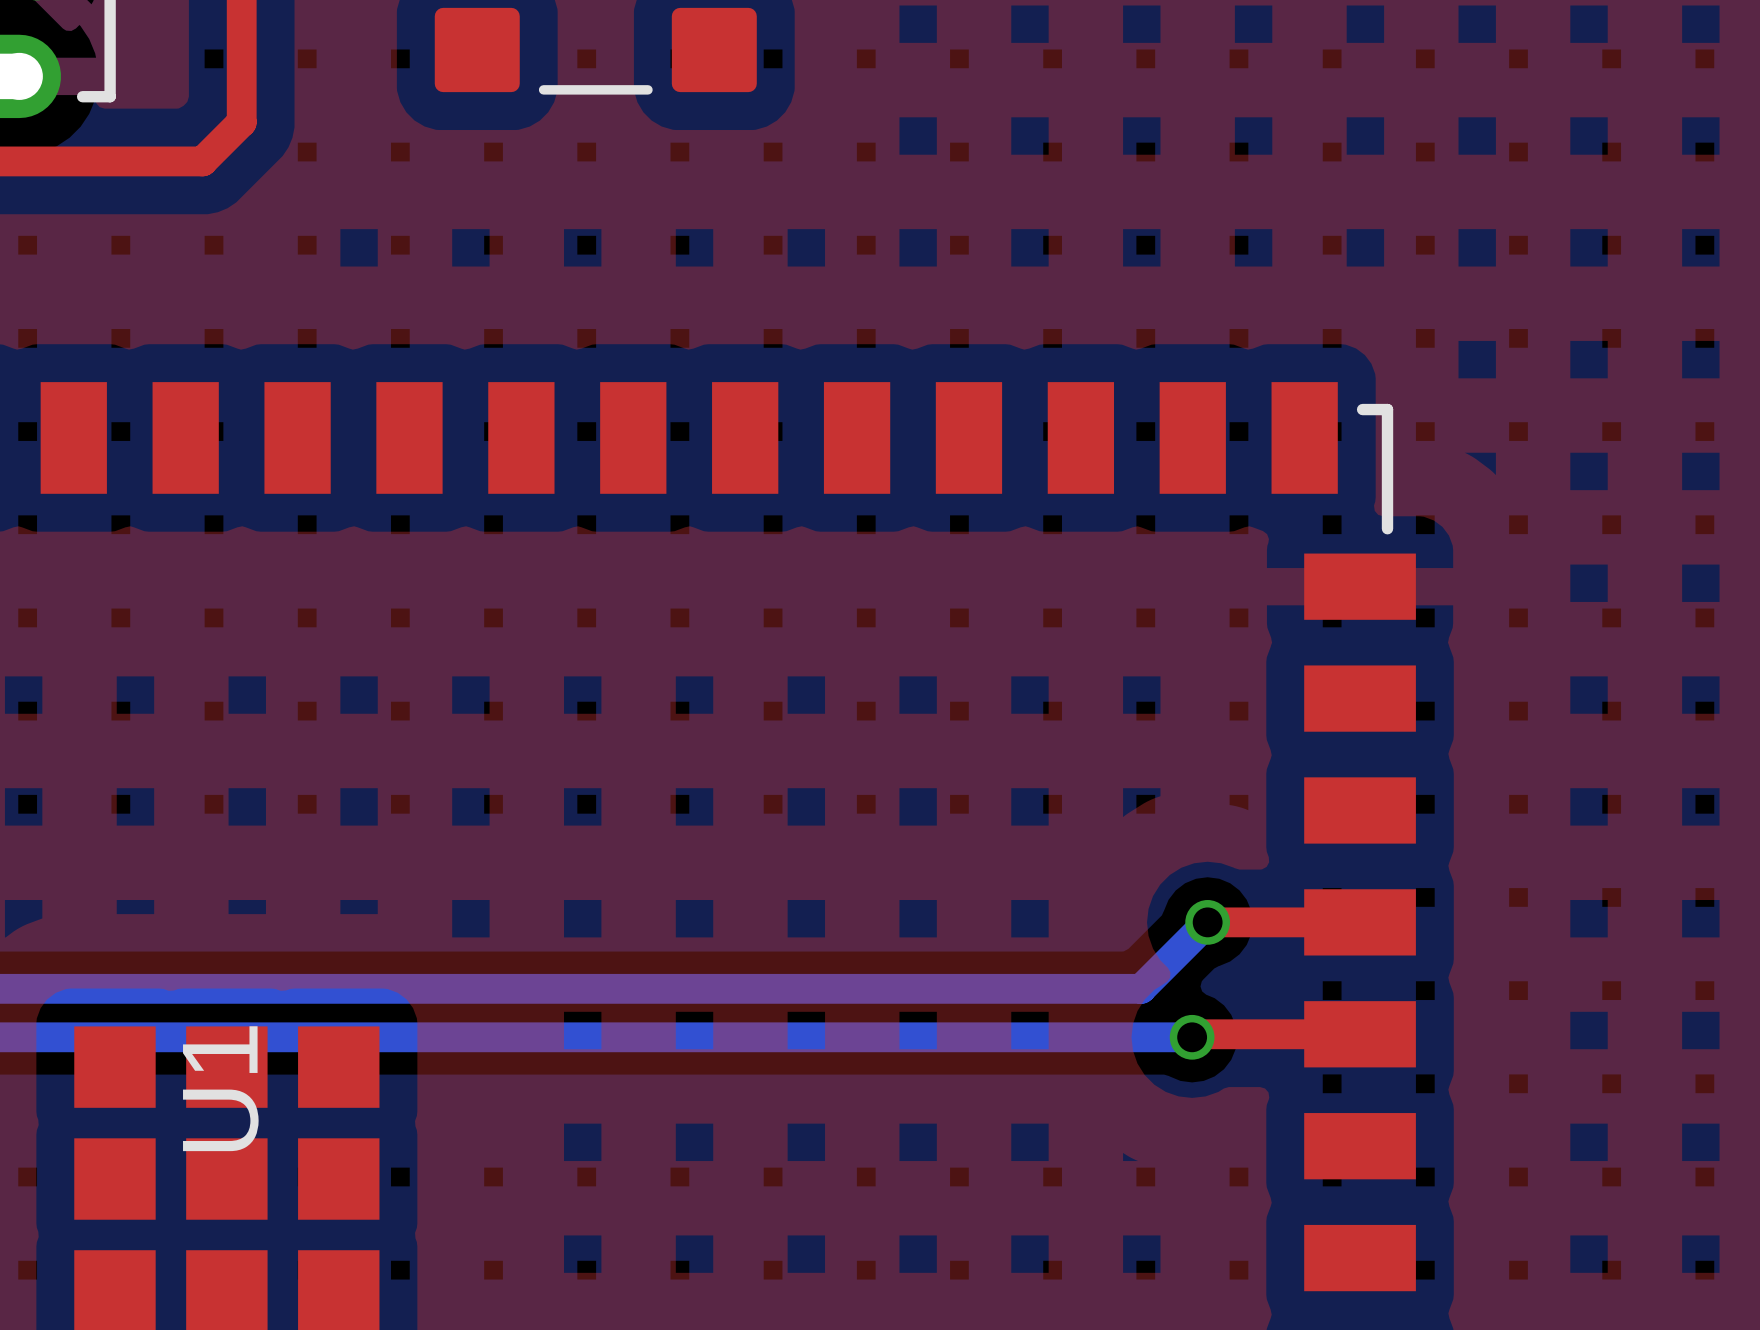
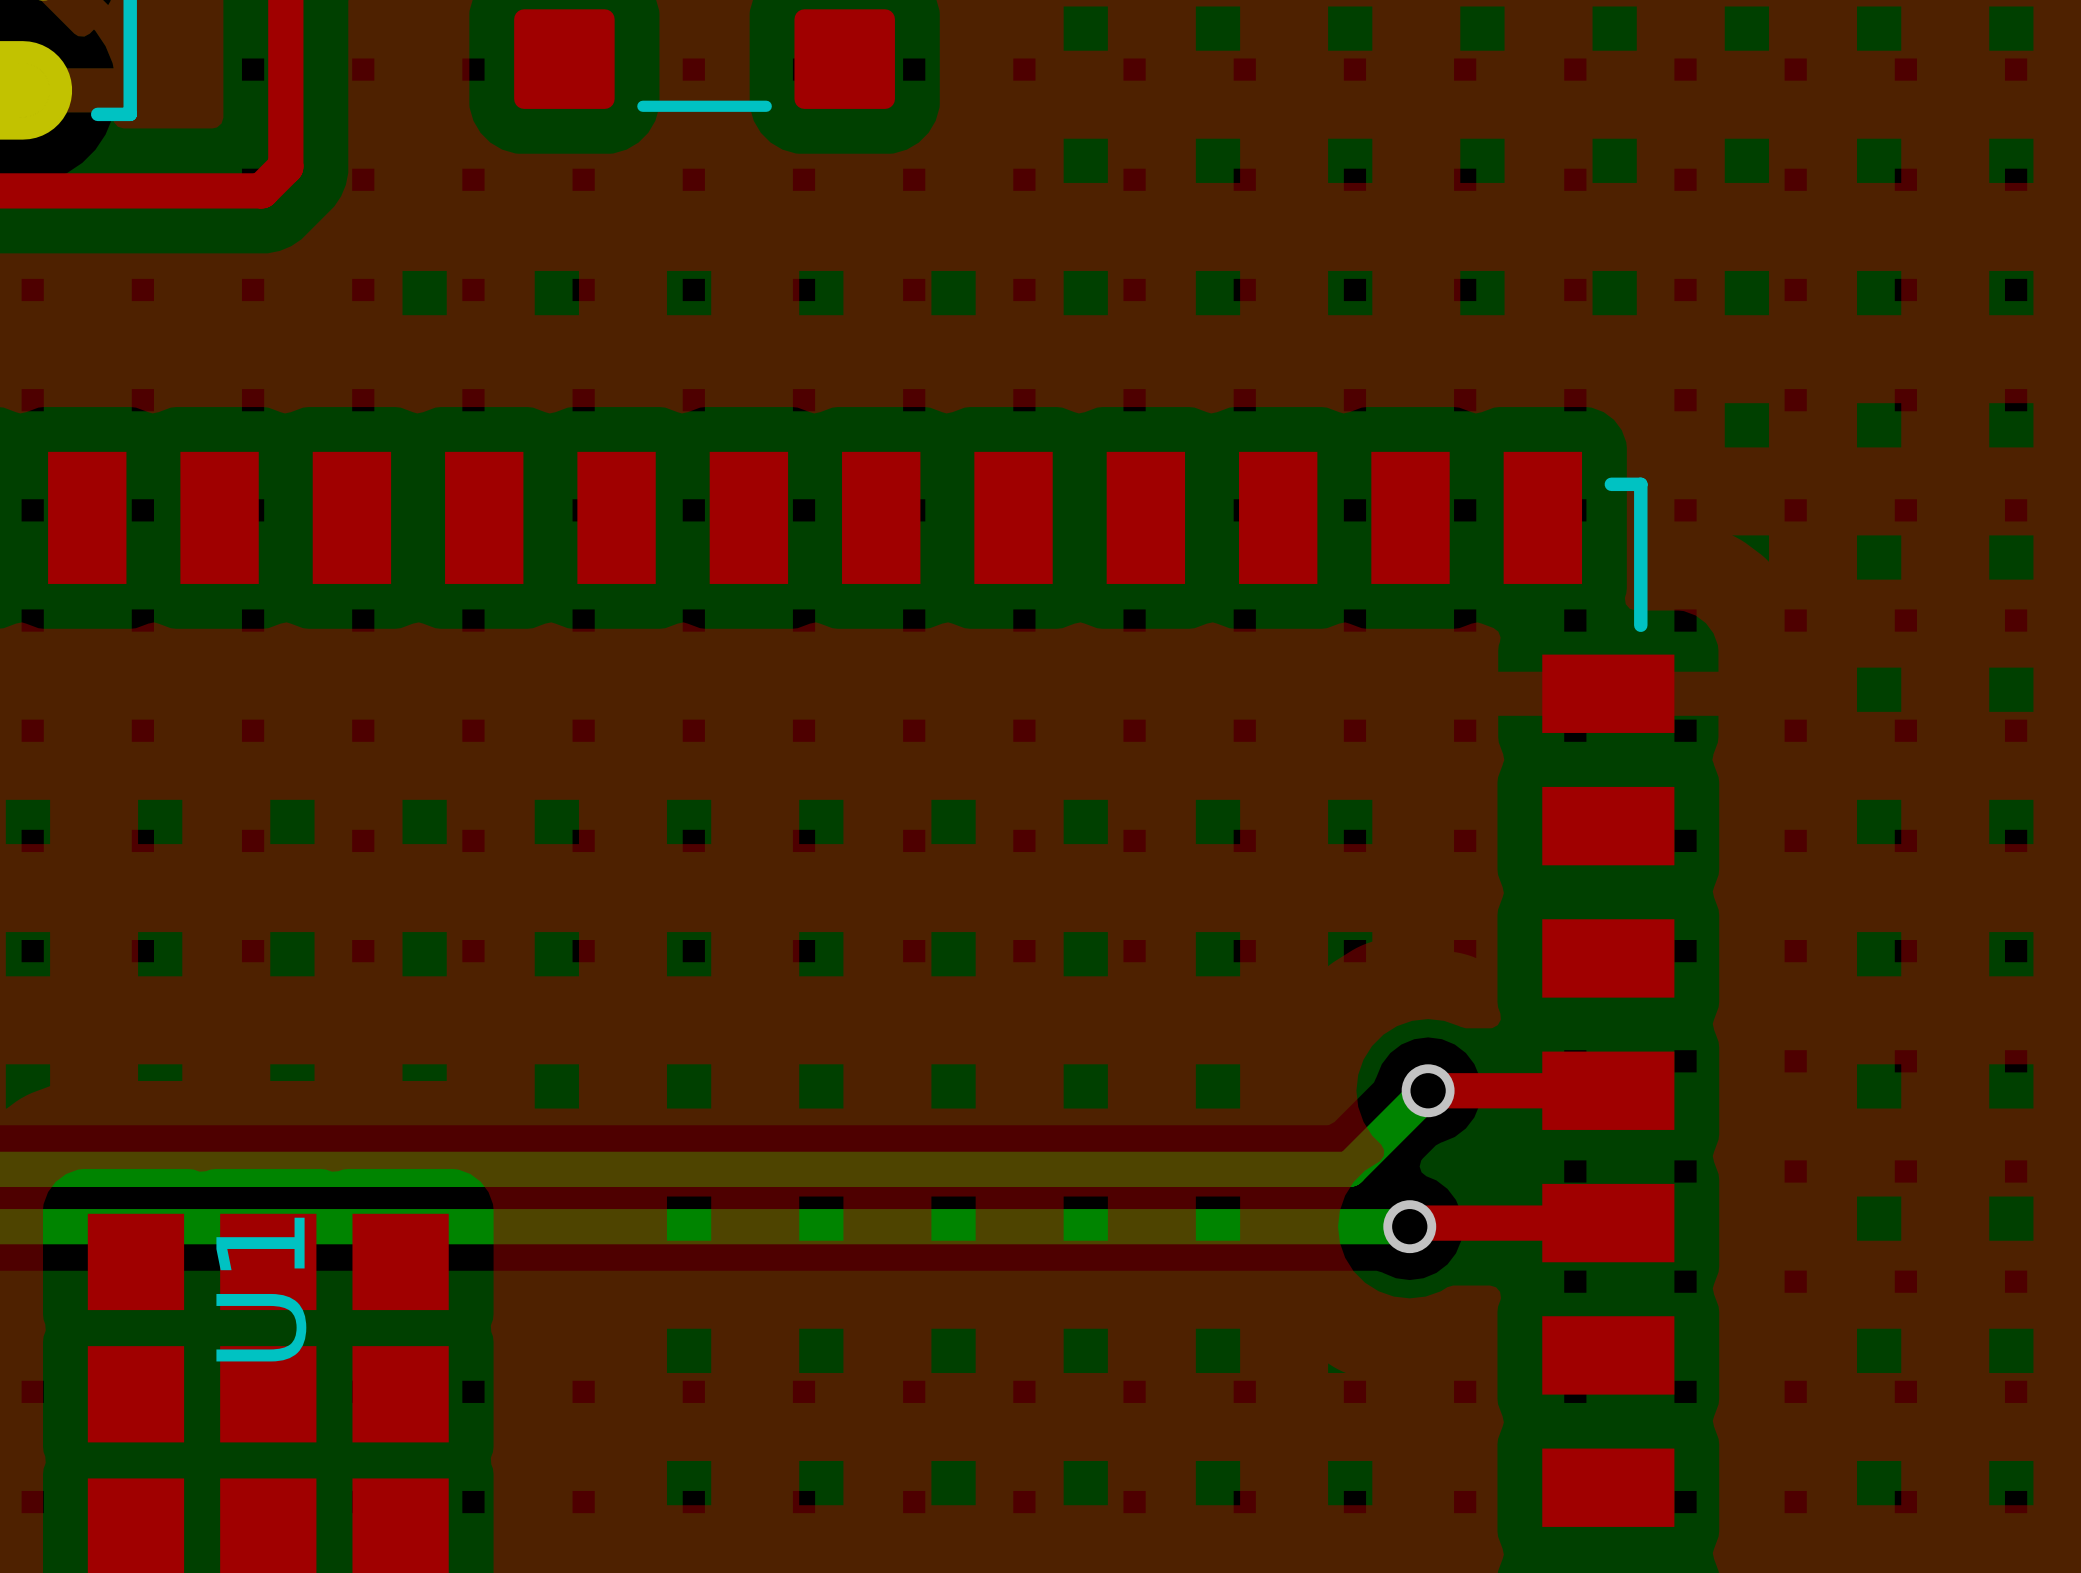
top track: (241, 122) (202, 161) -> (285, 144) (285, 166) (261, 190) (239, 190)

